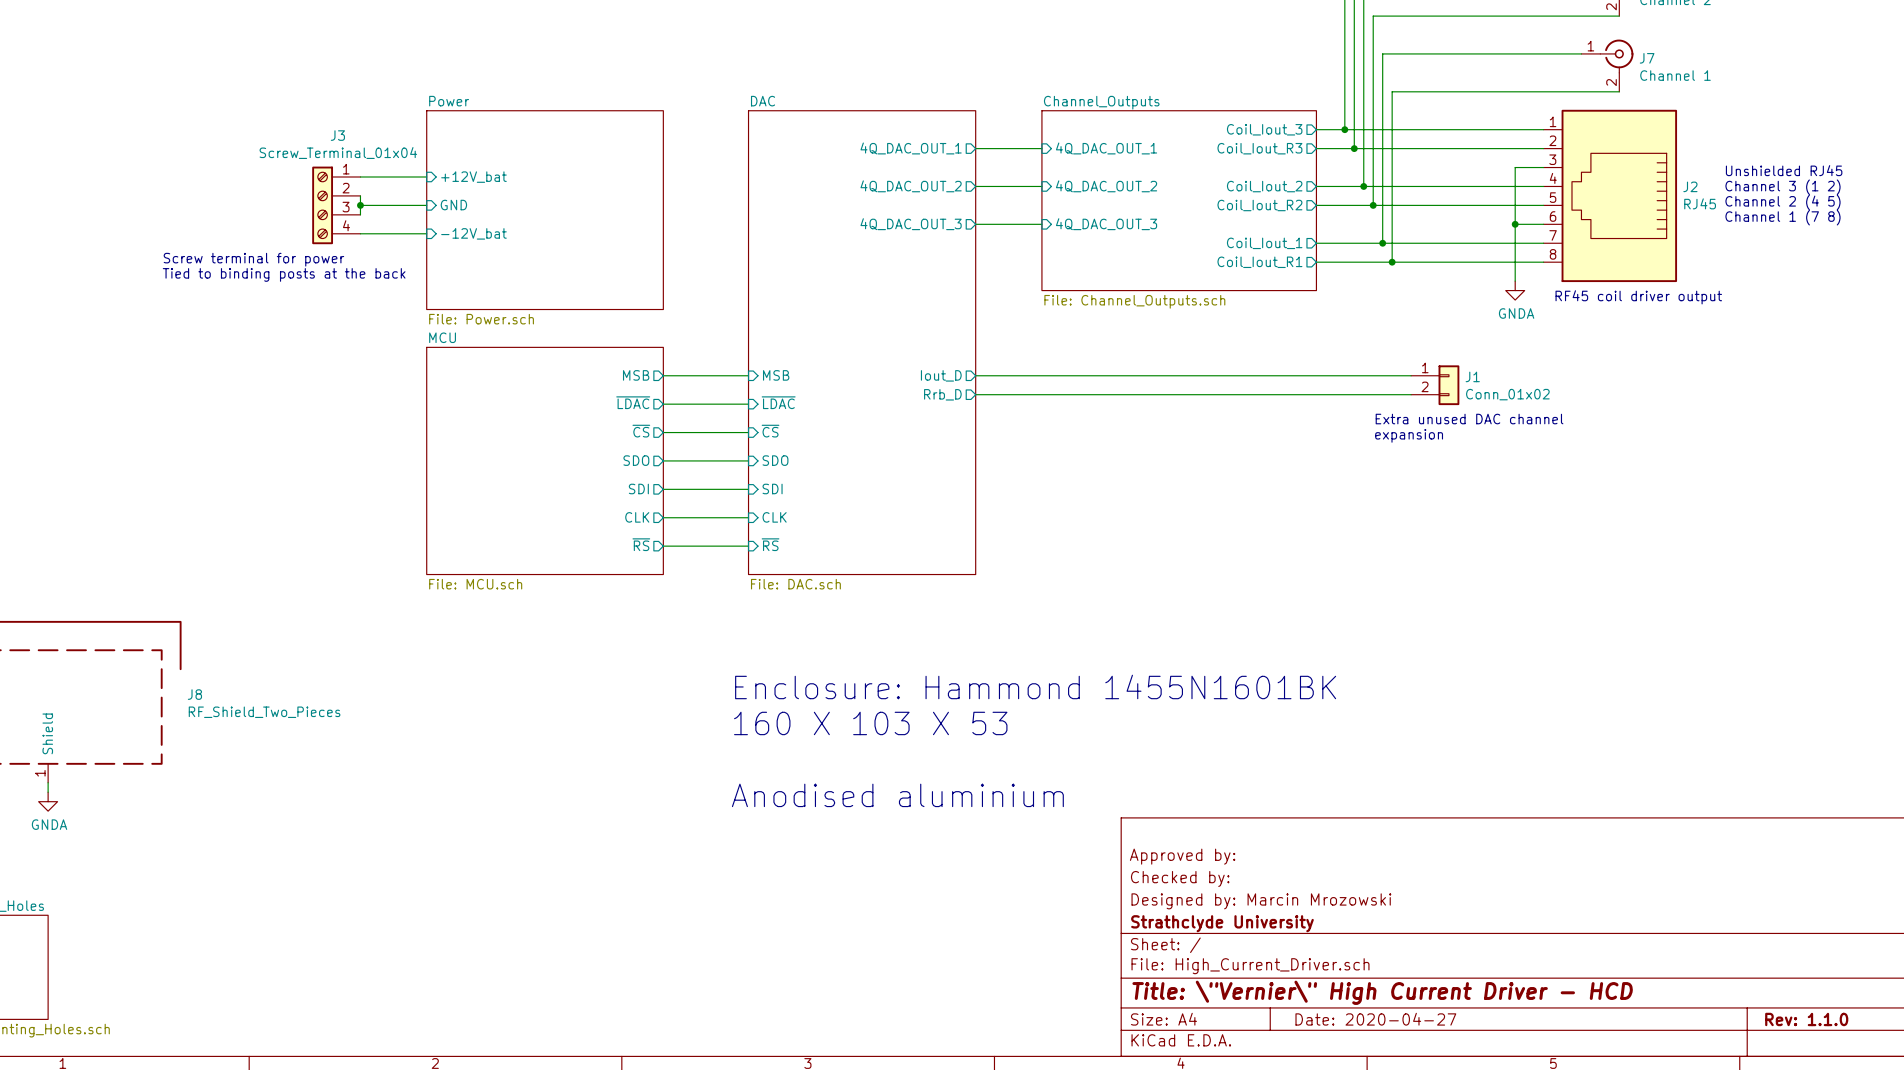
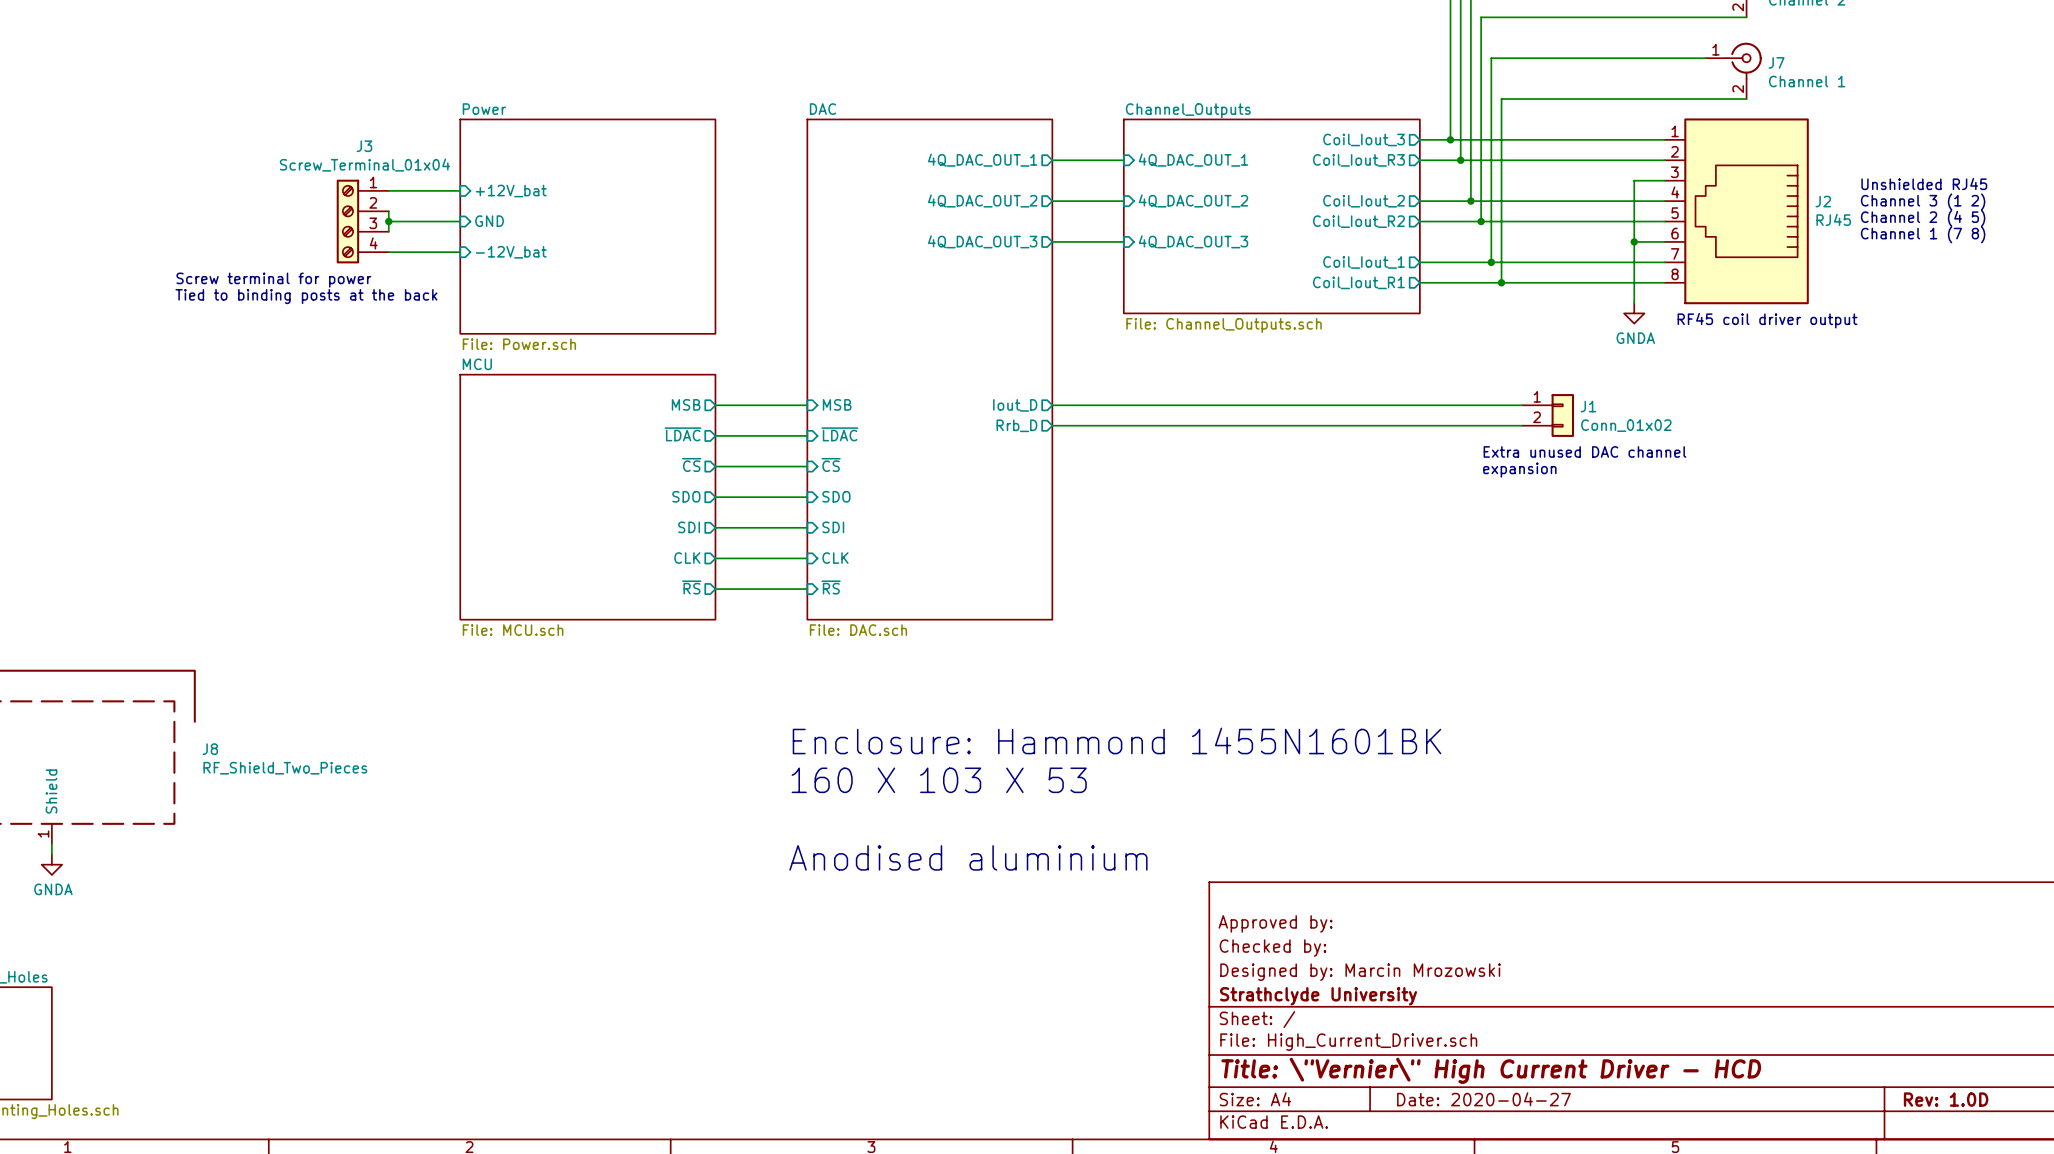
title block: Rev: 1.1.0 (1806, 1019) -> Rev: 1.0D (1946, 1099)

